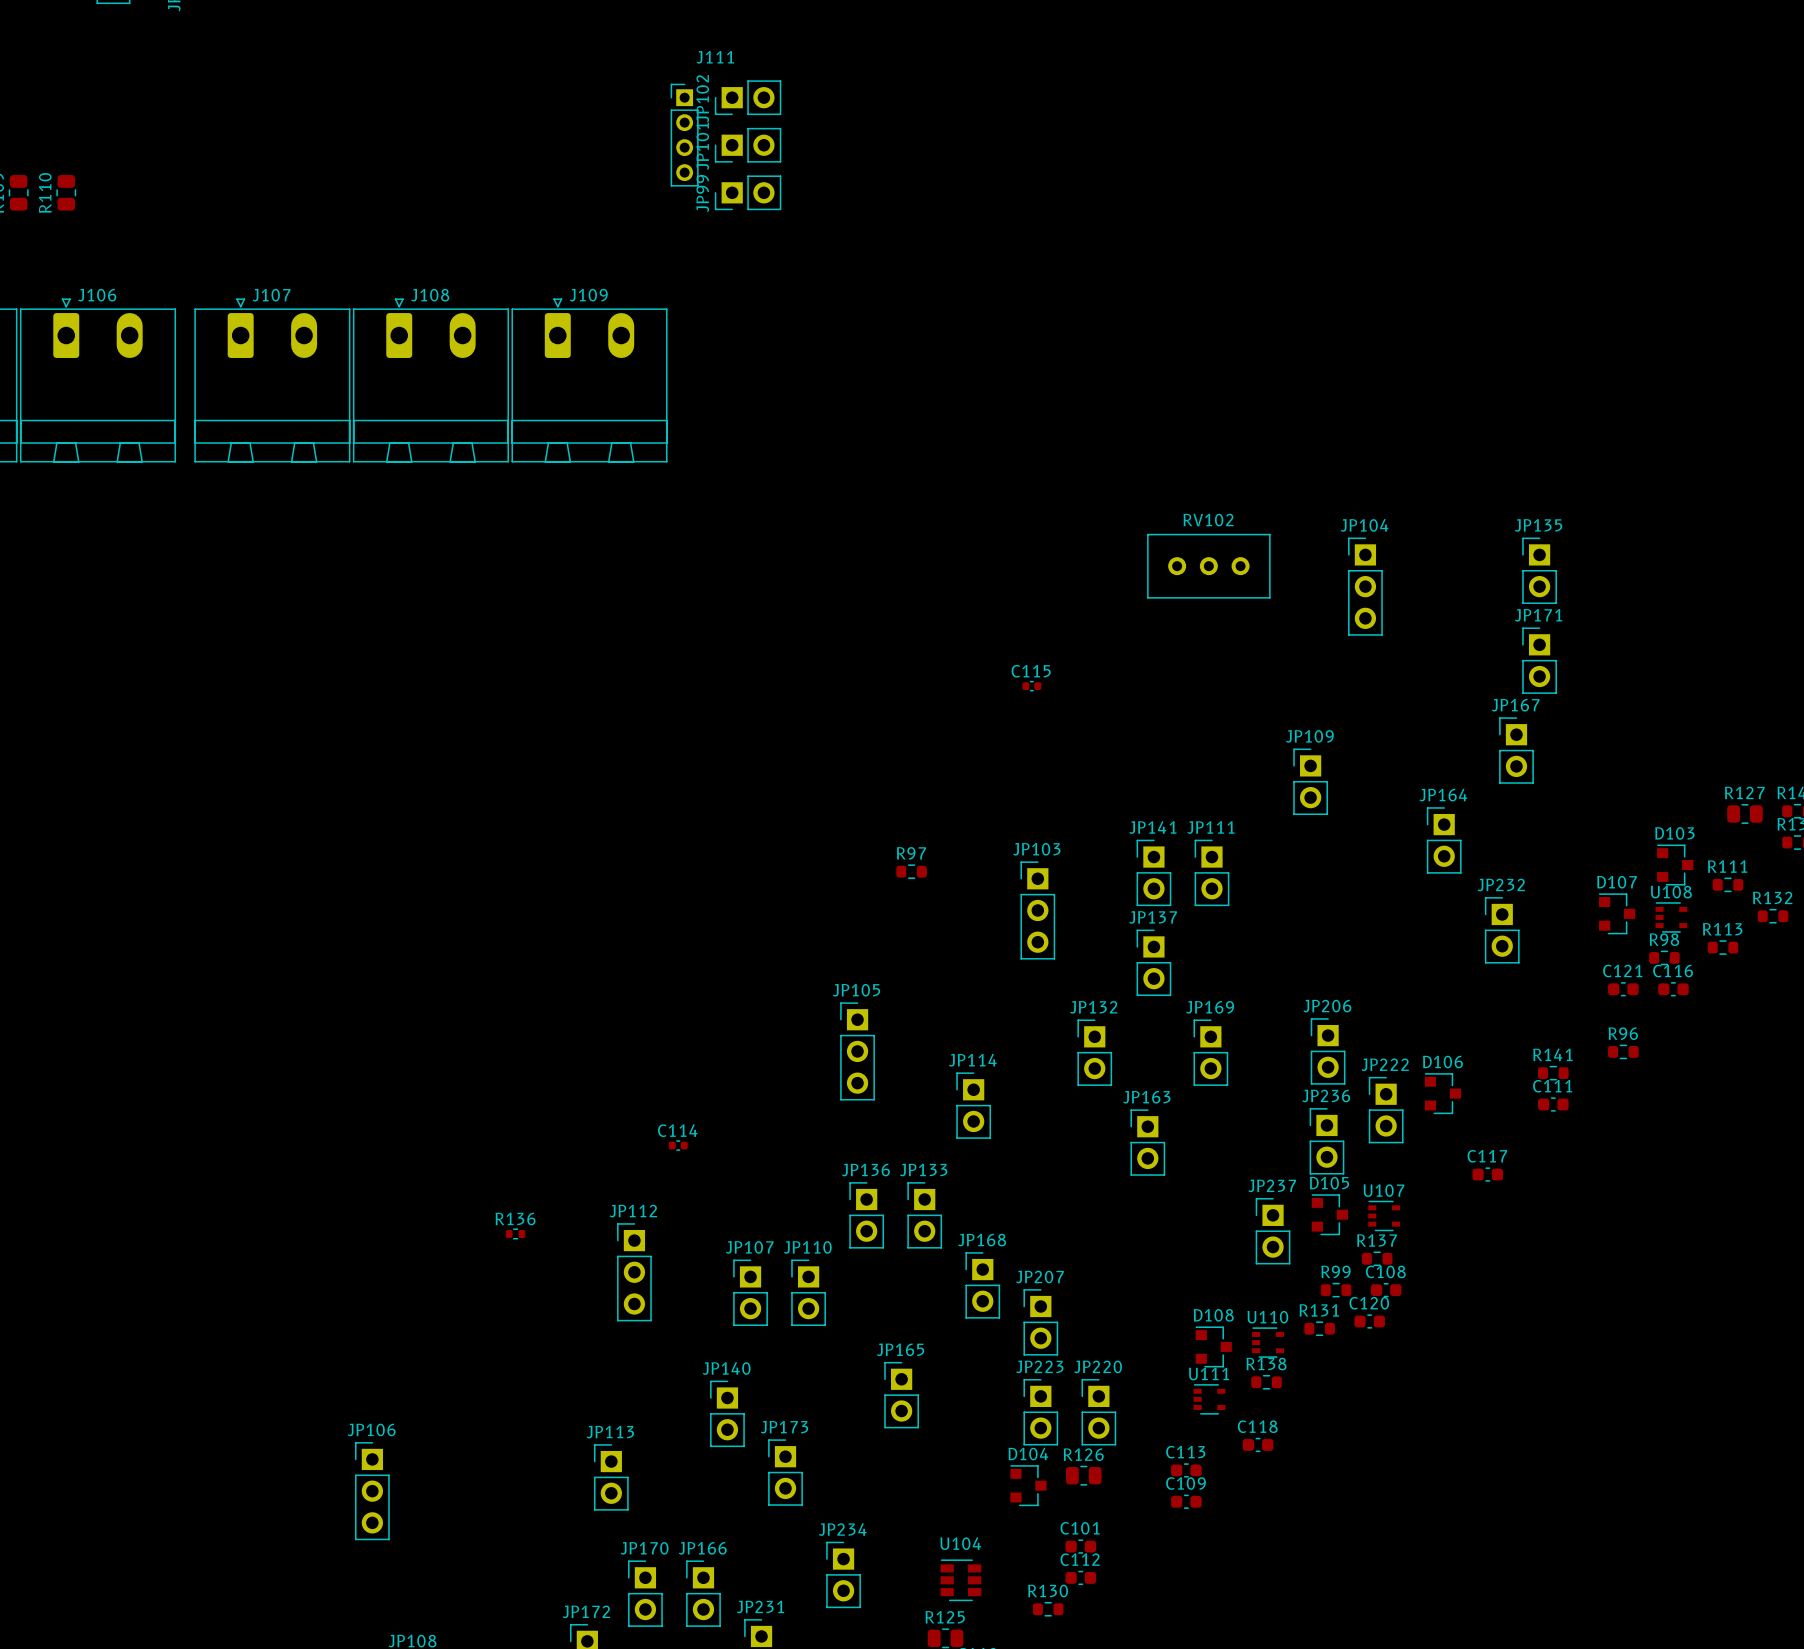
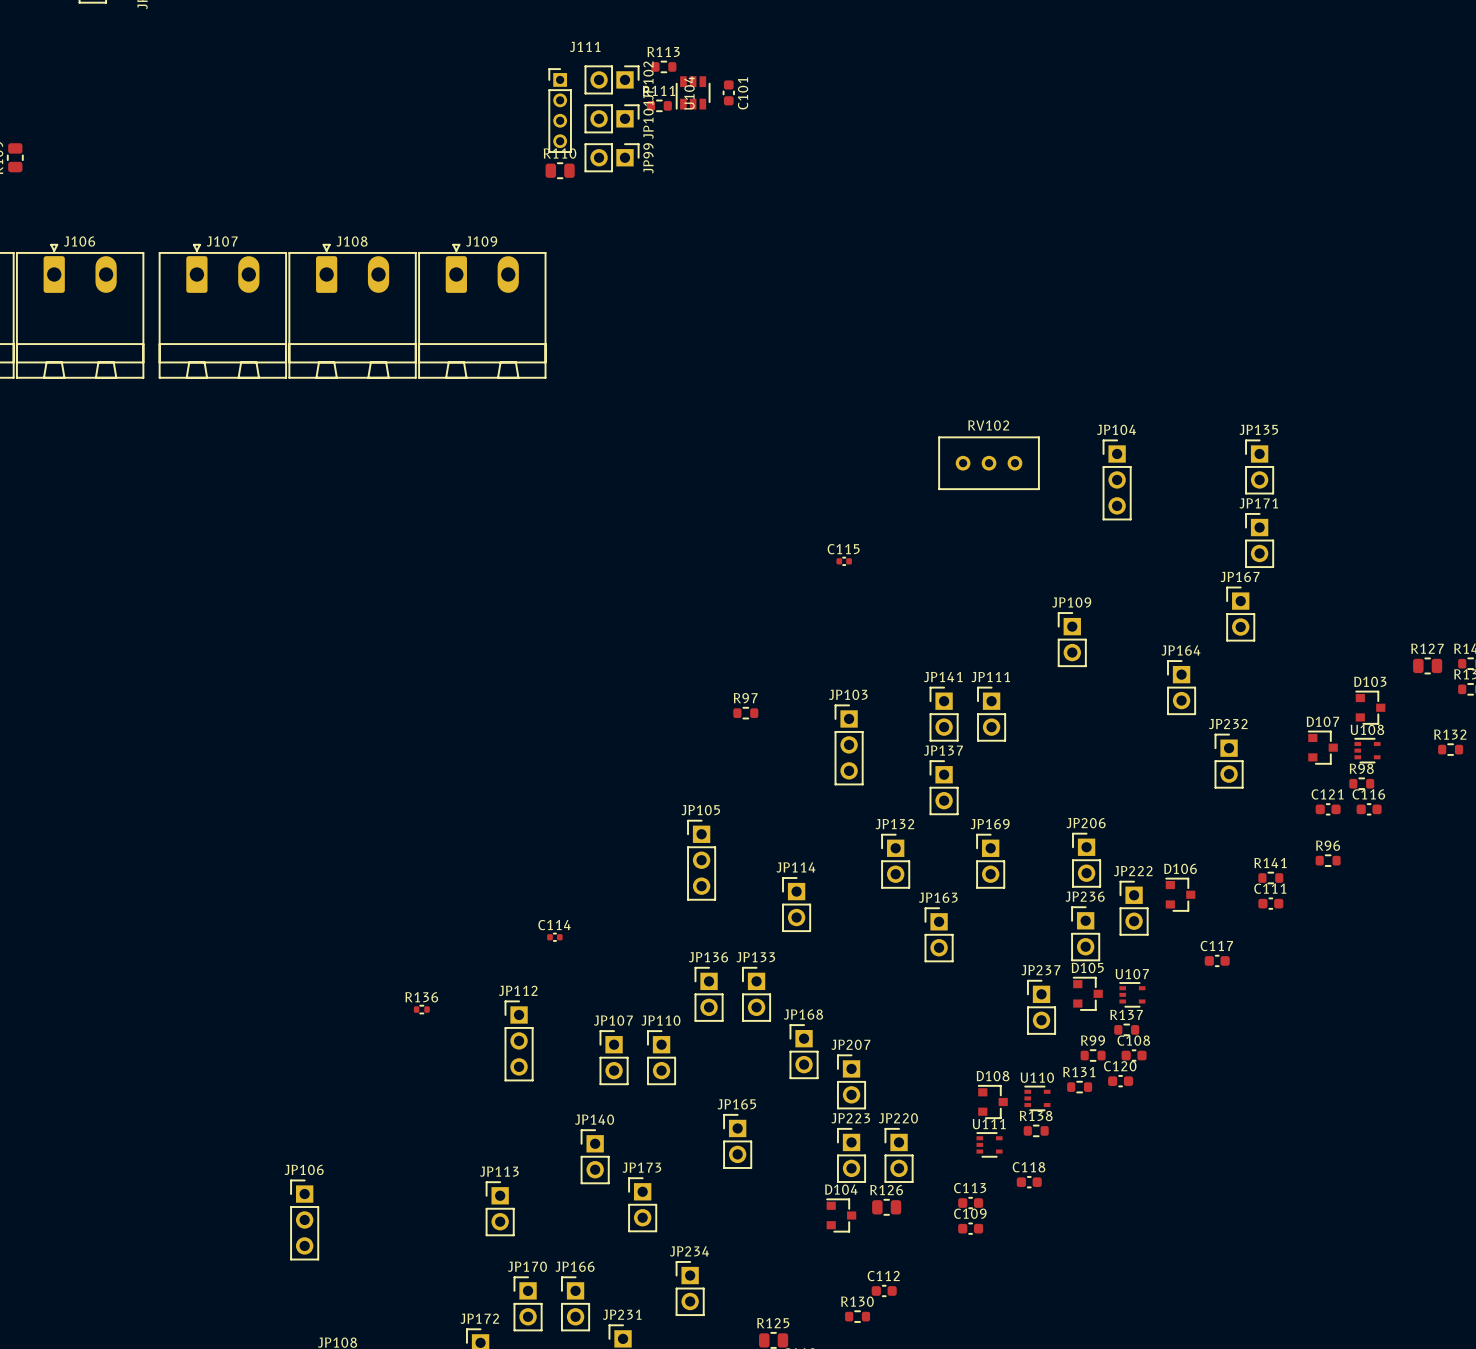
JP102 rotation: 0° (748, 97) -> 180° (612, 79)
JP101 rotation: 0° (748, 145) -> 180° (612, 118)
R110 rotation: 0° (66, 192) -> 90° clockwise (560, 170)
R110 position: (66, 192) -> (560, 170)
JP99 rotation: 0° (748, 192) -> 180° (612, 157)
R111 position: (1727, 884) -> (659, 105)
R113 position: (1722, 947) -> (663, 66)
U104 name position: U104 (960, 1543) -> U104 (689, 93)
C101 rotation: 0° (1080, 1546) -> 90° clockwise (728, 92)
C101 position: (1080, 1546) -> (728, 92)
U104 rotation: 0° (960, 1580) -> 90° counterclockwise (693, 92)
U104 position: (960, 1580) -> (693, 92)

